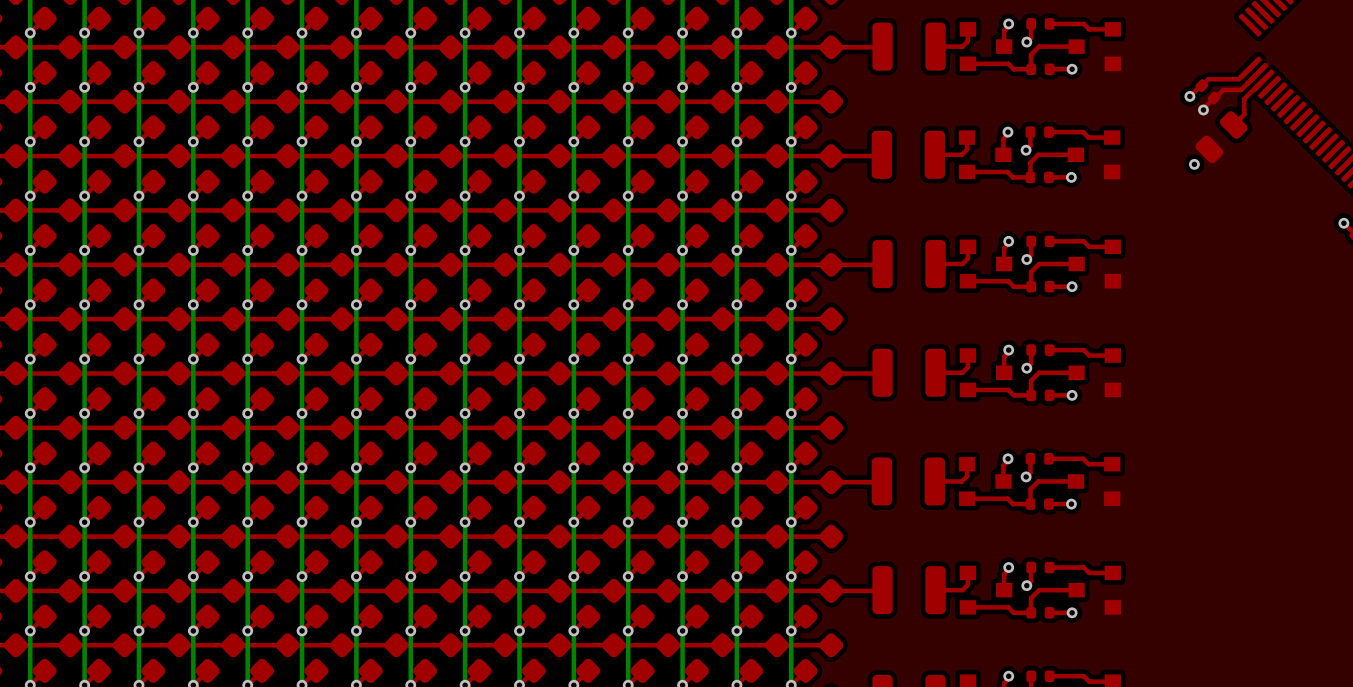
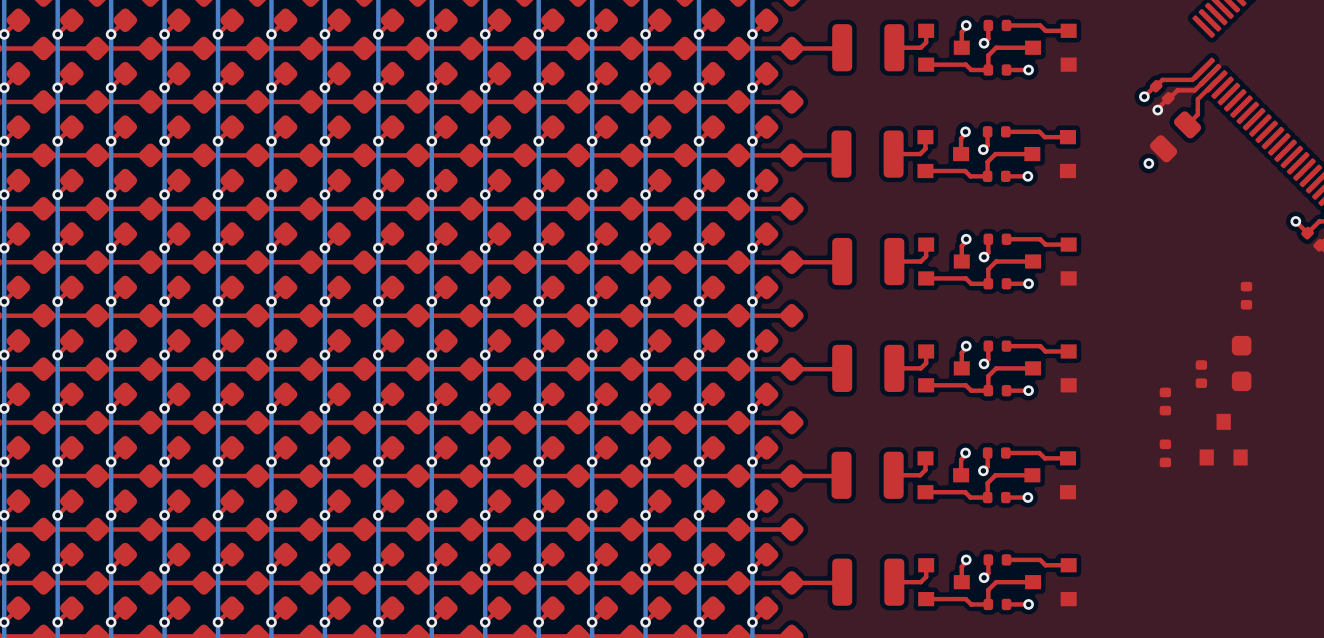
part: none -> (1246, 295)
part: none -> (1241, 363)
part: none -> (1201, 374)
part: none -> (1165, 401)
part: none -> (1223, 439)
part: none -> (1165, 453)

